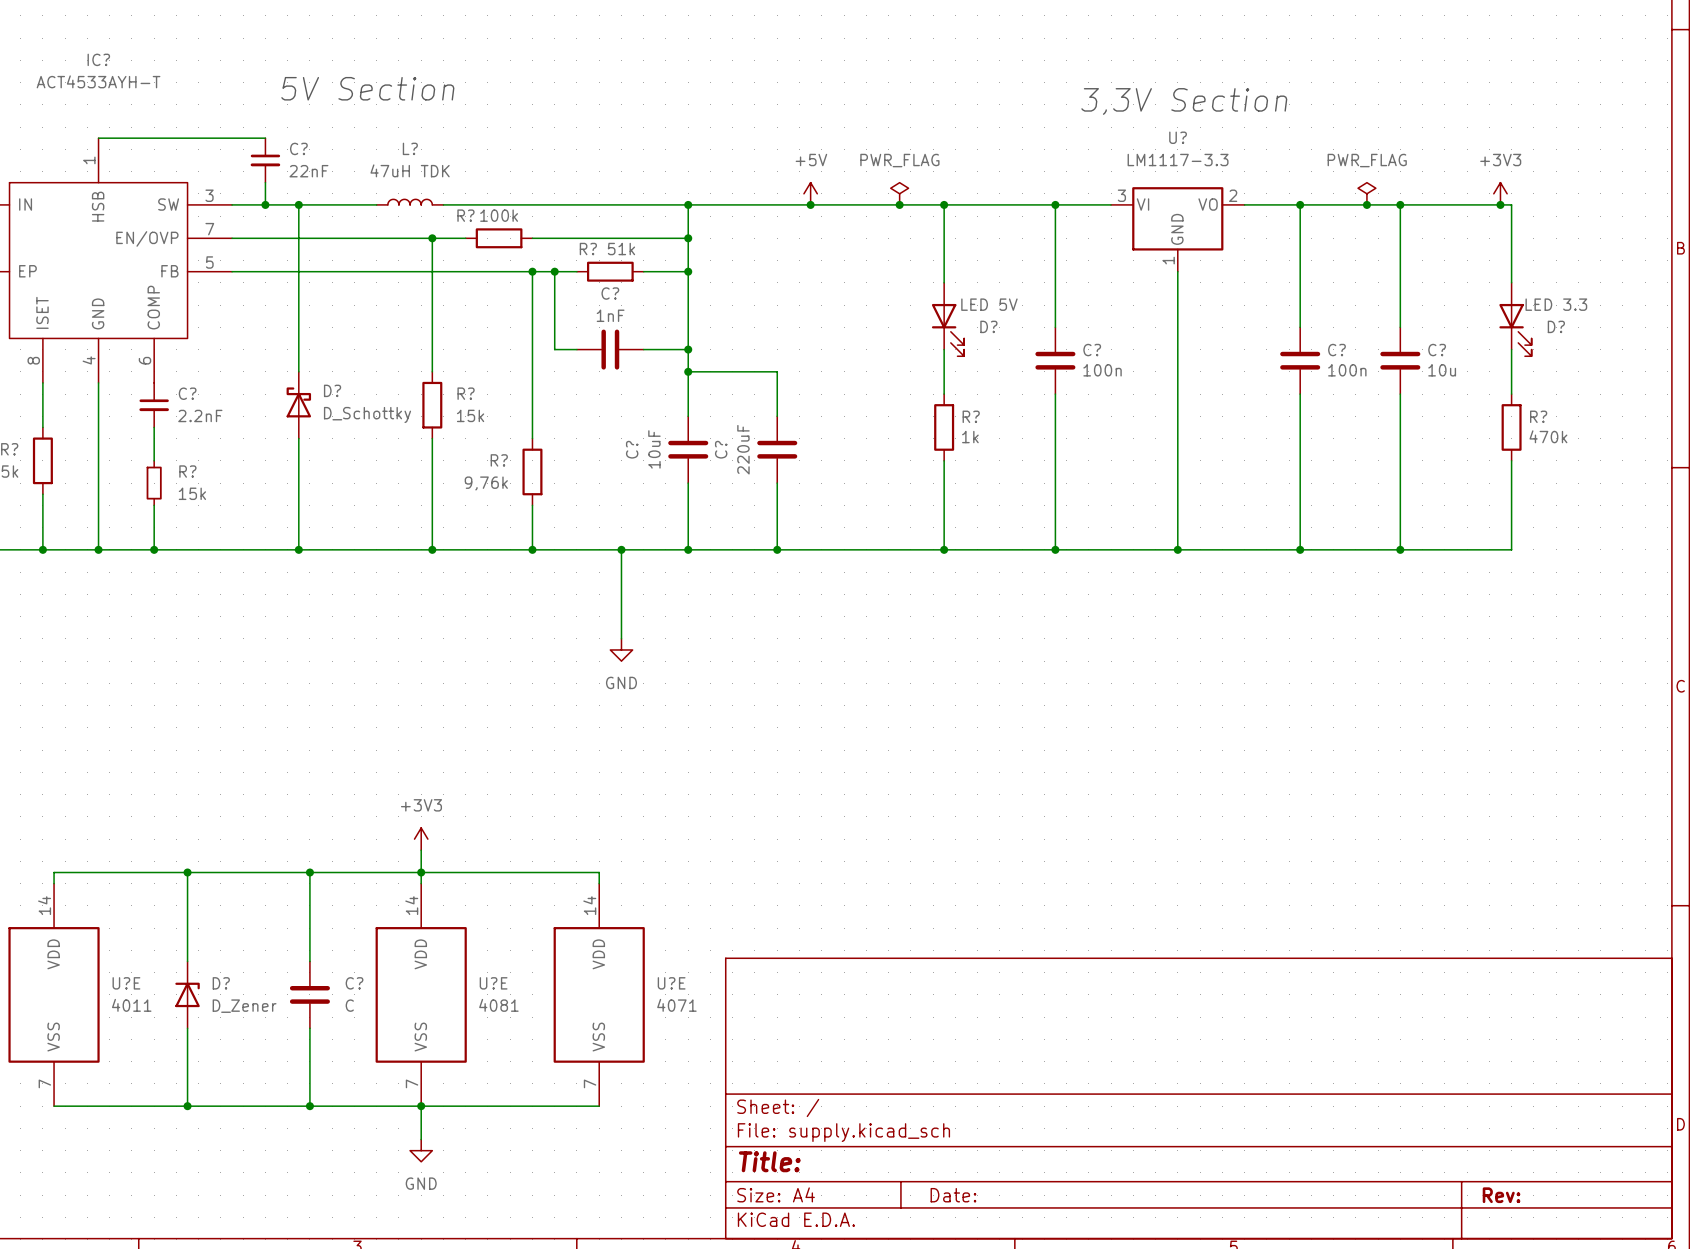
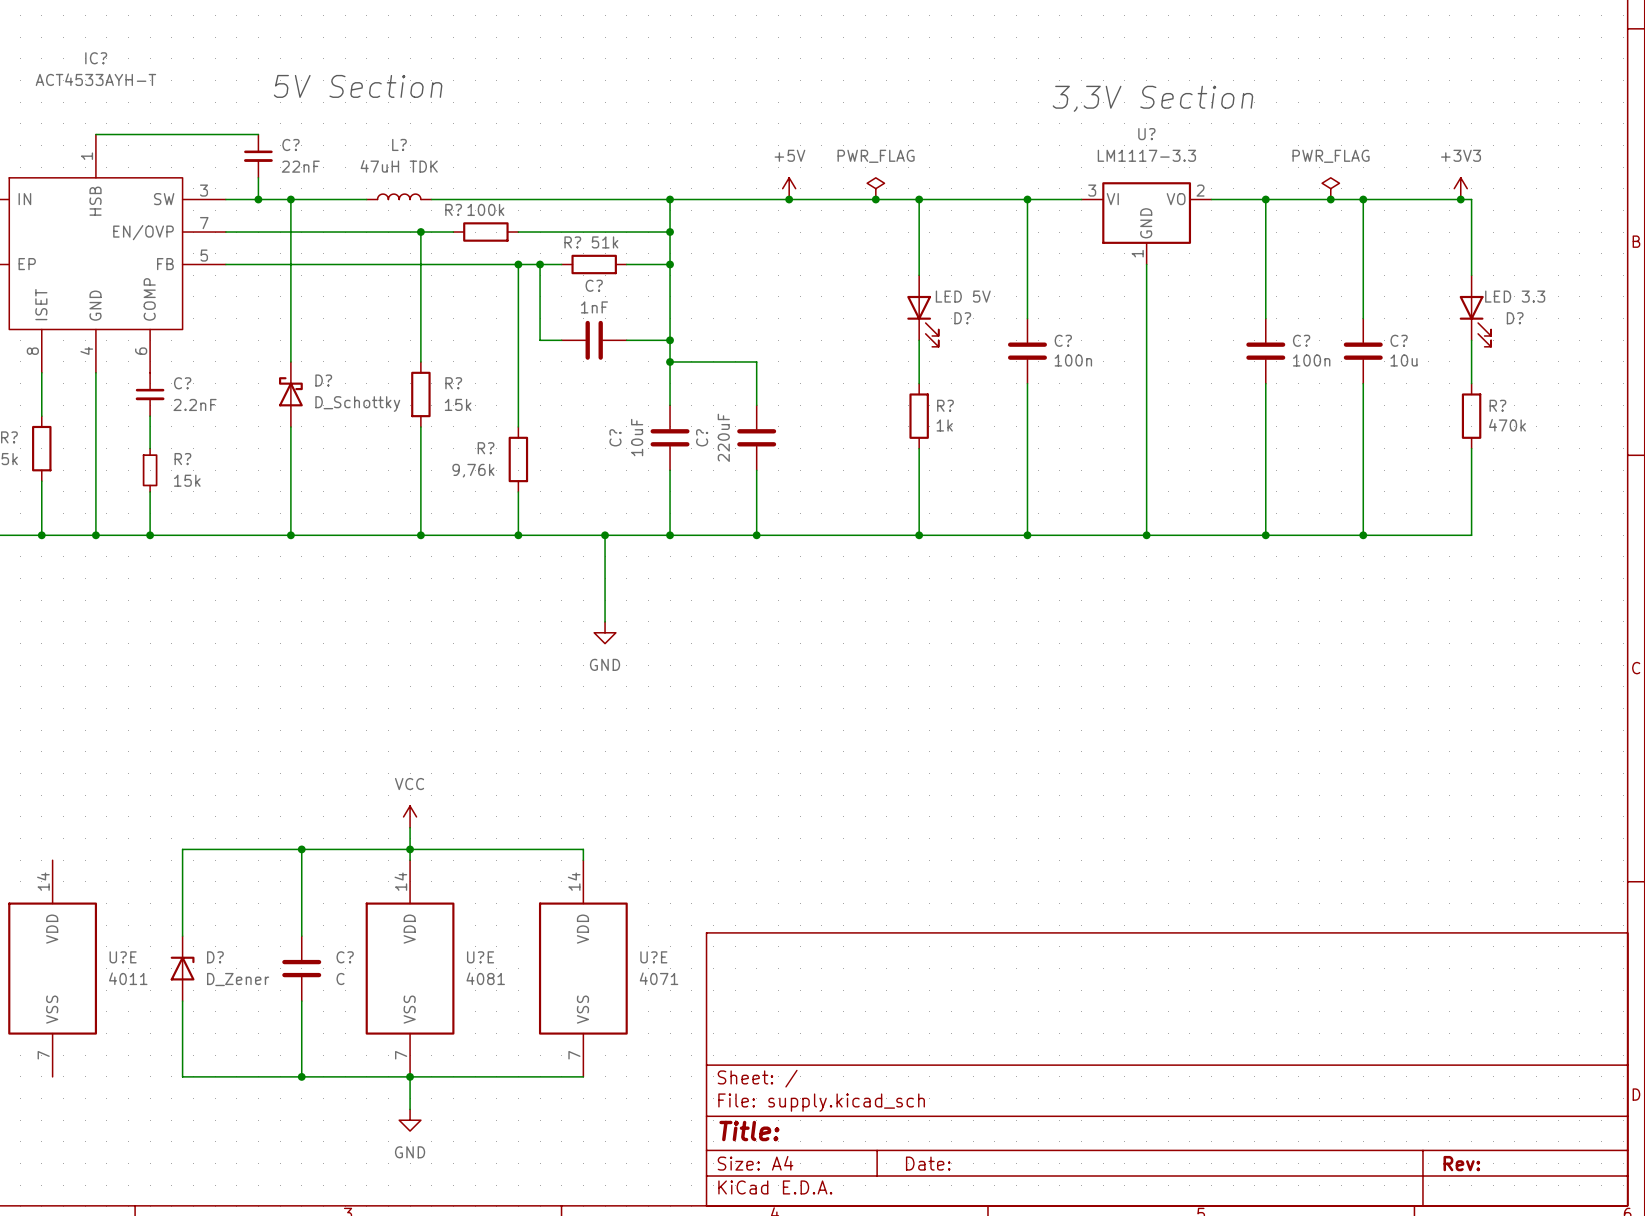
power symbol: +3V3 (421, 839) -> VCC (410, 816)
wire: (187, 872) (54, 872) (54, 883) -> none
junction: (187, 872) -> none
wire: (54, 1106) (187, 1106) -> none
junction: (187, 1106) -> none

